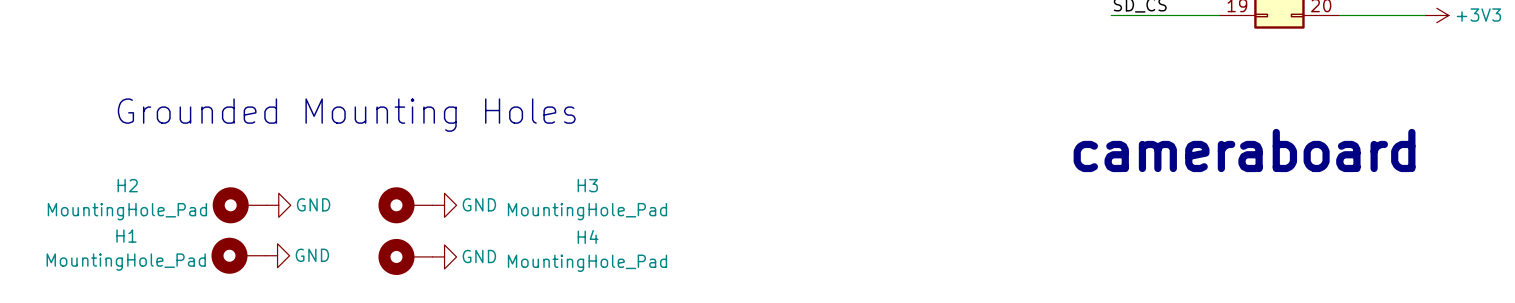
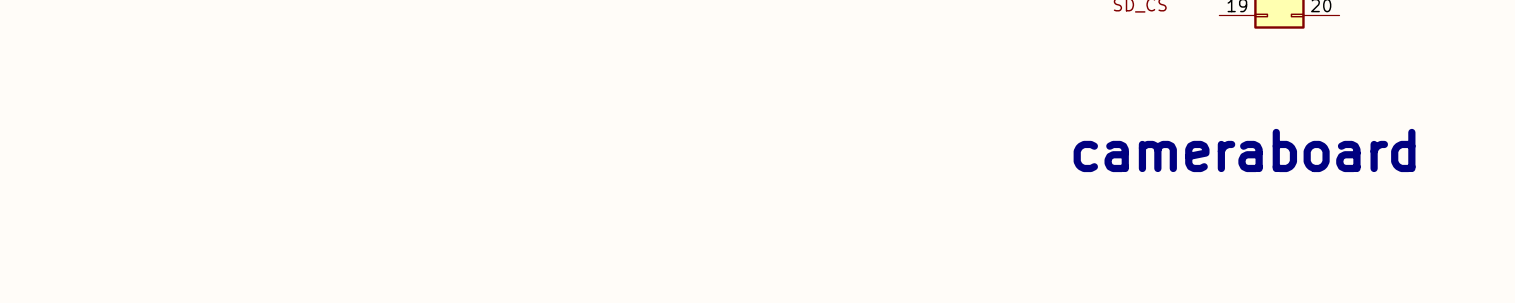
wire: (1111, 15) (1219, 15) -> none
wire: (1339, 15) (1424, 15) -> none
power symbol: +3V3 (1436, 15) -> none
text: Grounded Mounting Holes (346, 115) -> none
H2: MountingHole_Pad (239, 205) -> none
power symbol: GND (278, 205) -> none
H3: MountingHole_Pad (405, 205) -> none
power symbol: GND (444, 205) -> none
H1: MountingHole_Pad (238, 255) -> none
power symbol: GND (277, 255) -> none
H4: MountingHole_Pad (405, 256) -> none
power symbol: GND (444, 256) -> none

